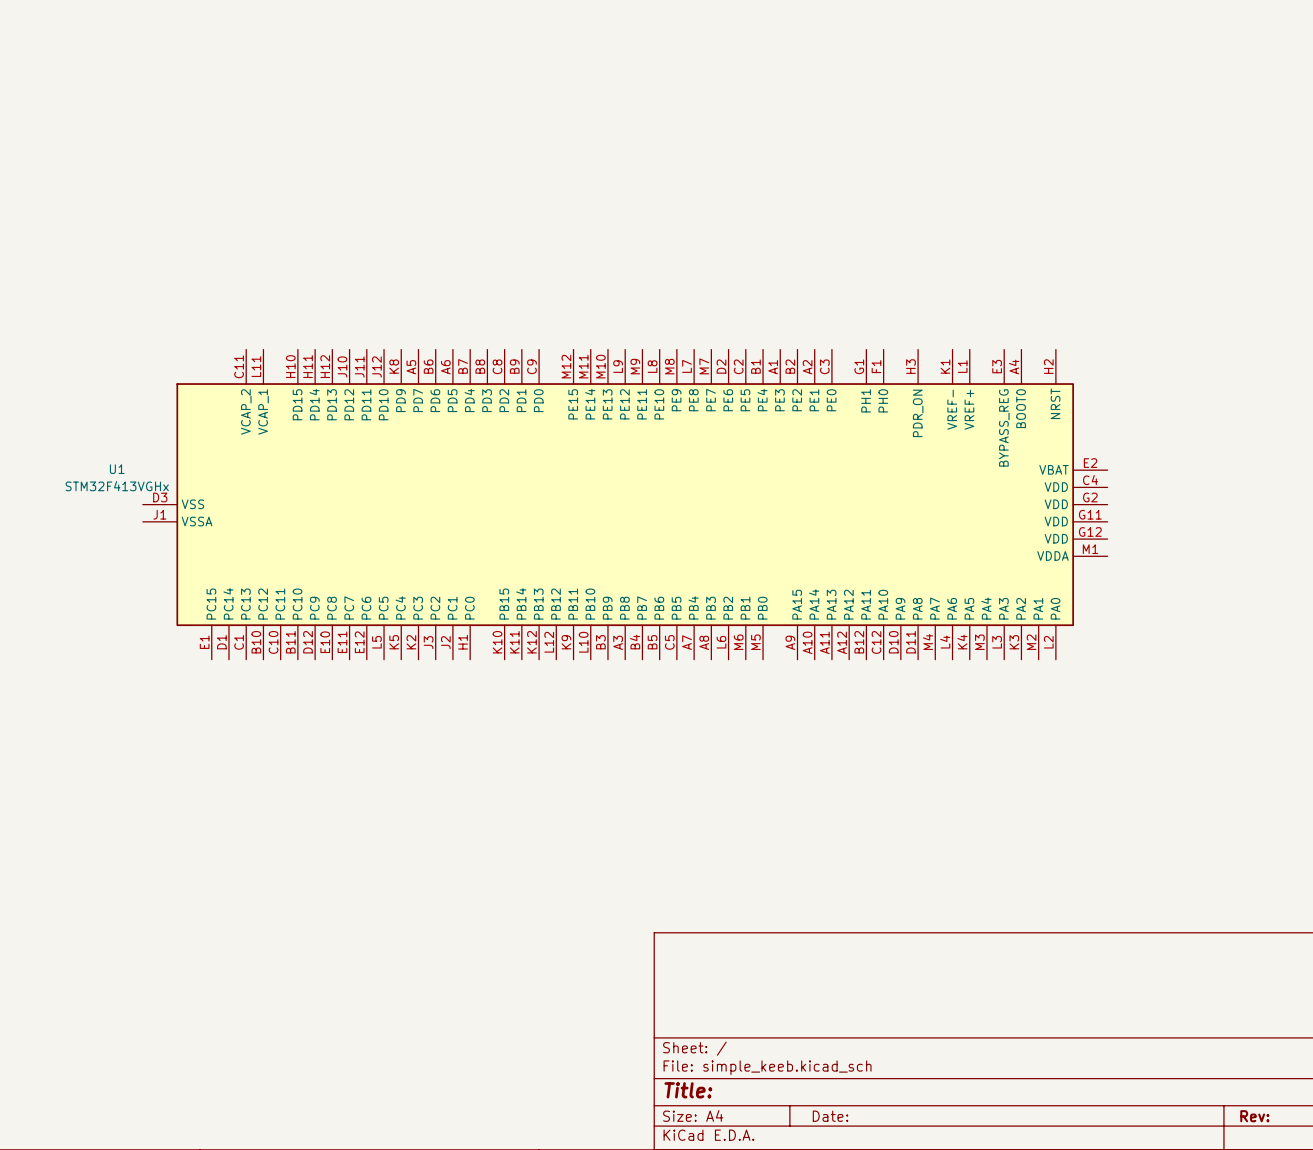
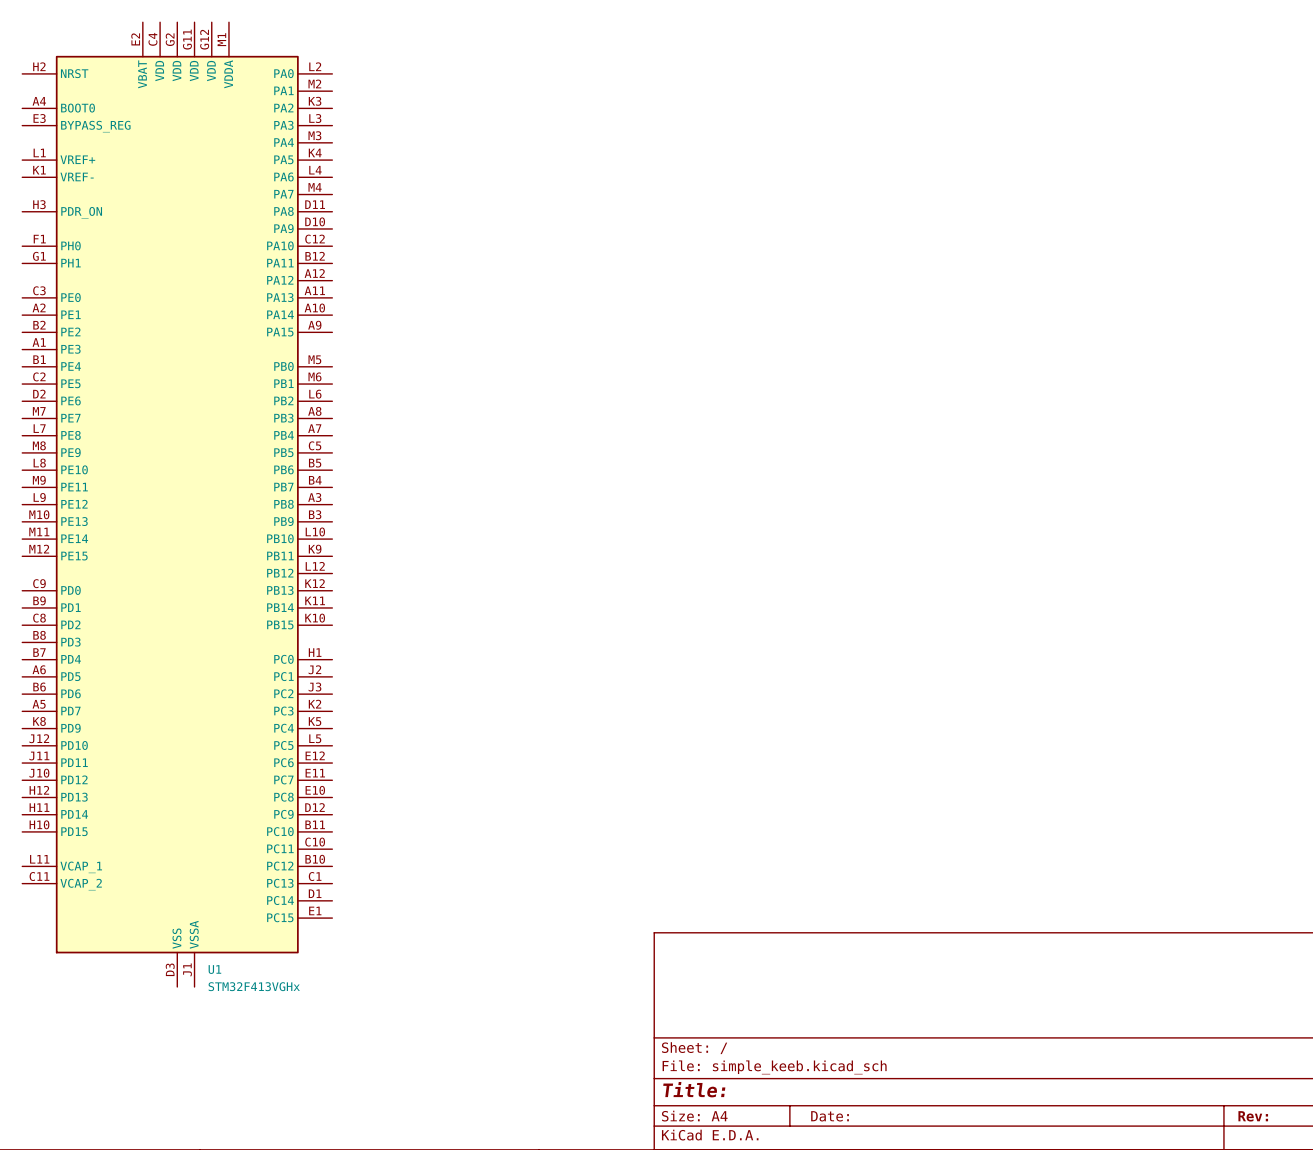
U1 name position: U1 (117, 469) -> U1 (214, 969)
U1 value position: STM32F413VGHx (117, 486) -> STM32F413VGHx (254, 986)
U1 rotation: 0° (625, 504) -> 90° counterclockwise (177, 504)

